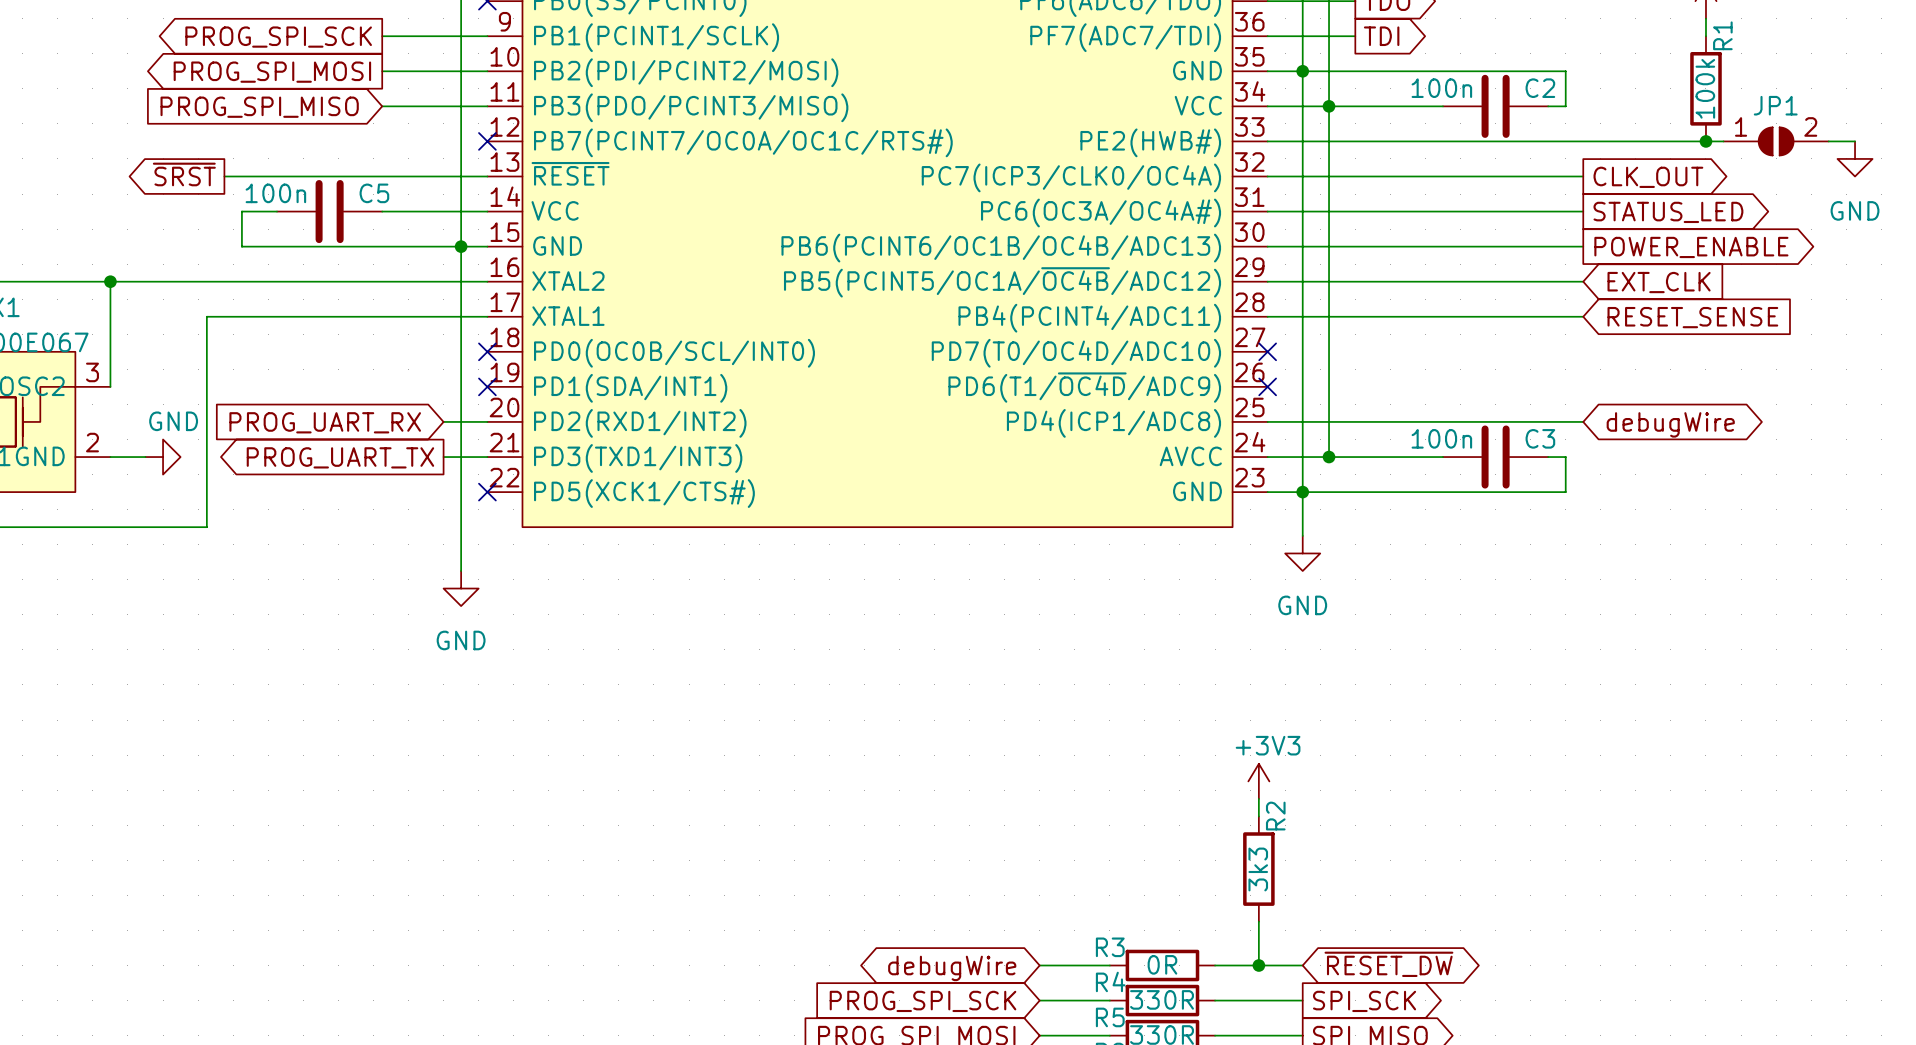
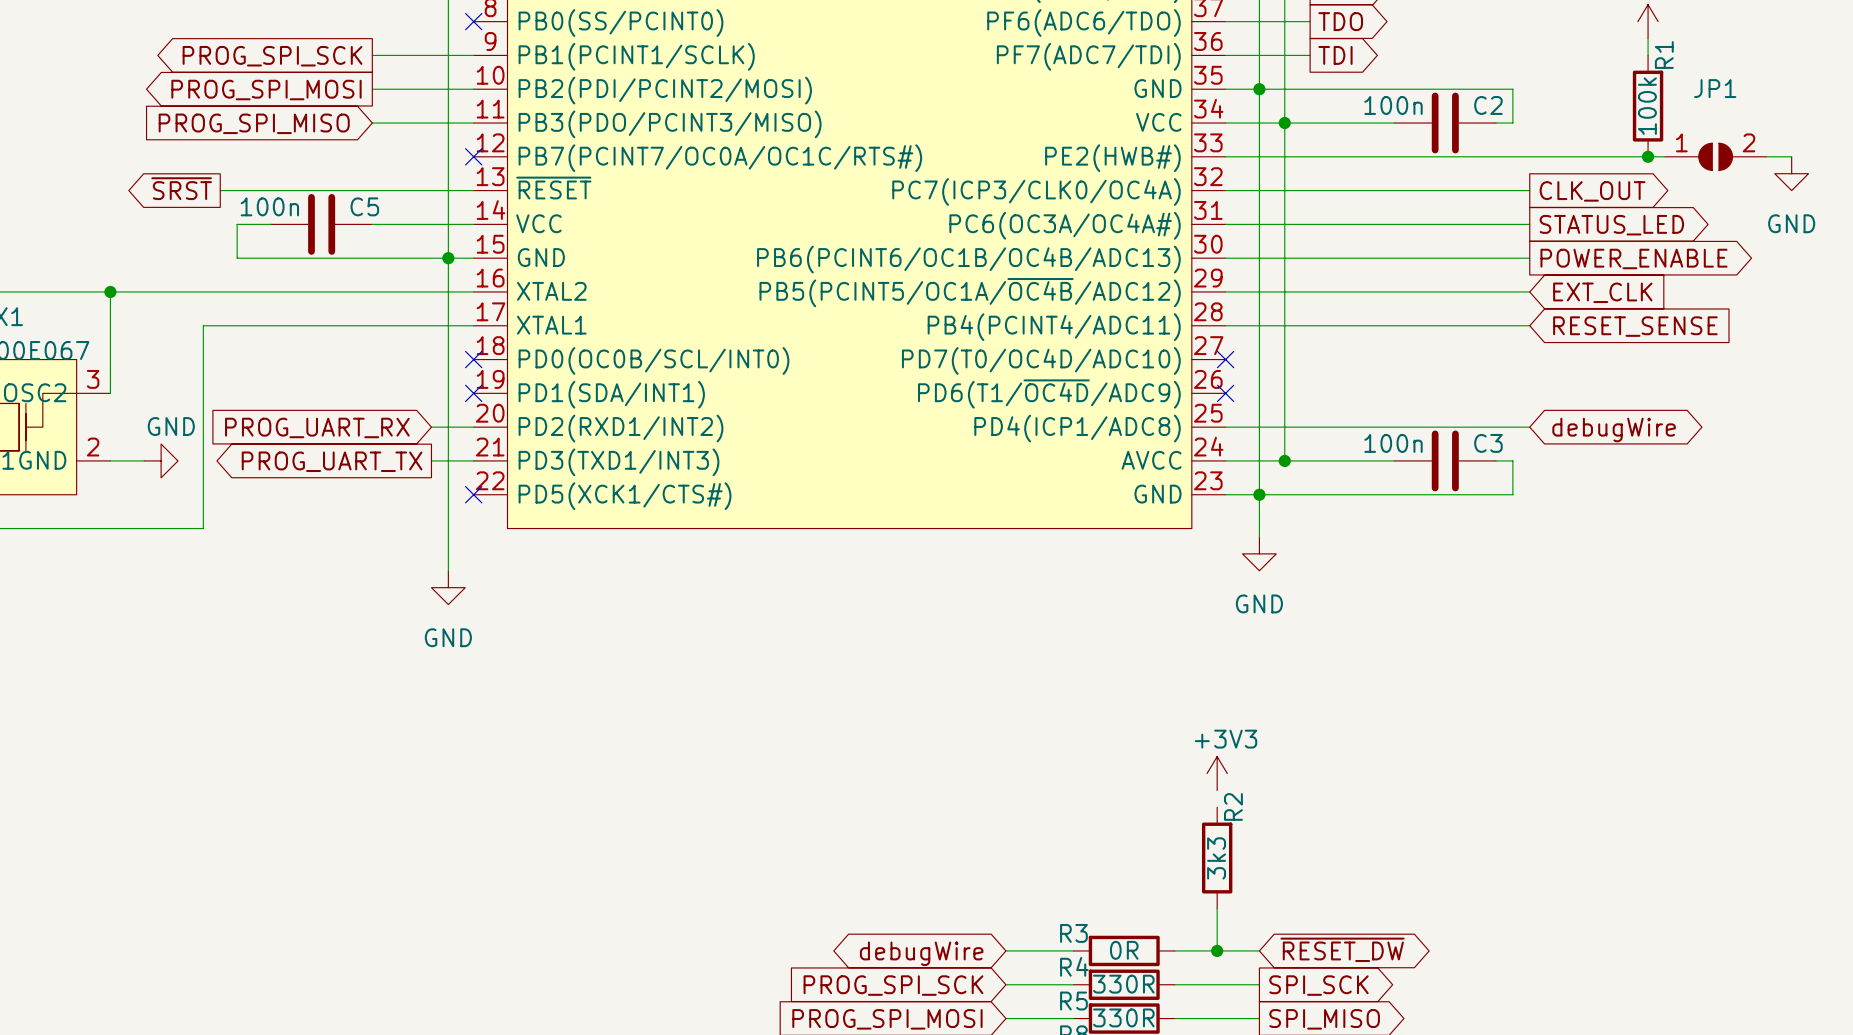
JP1 name position: JP1 (1775, 105) -> JP1 (1715, 88)
wire: (1258, 798) (1258, 816) -> none

